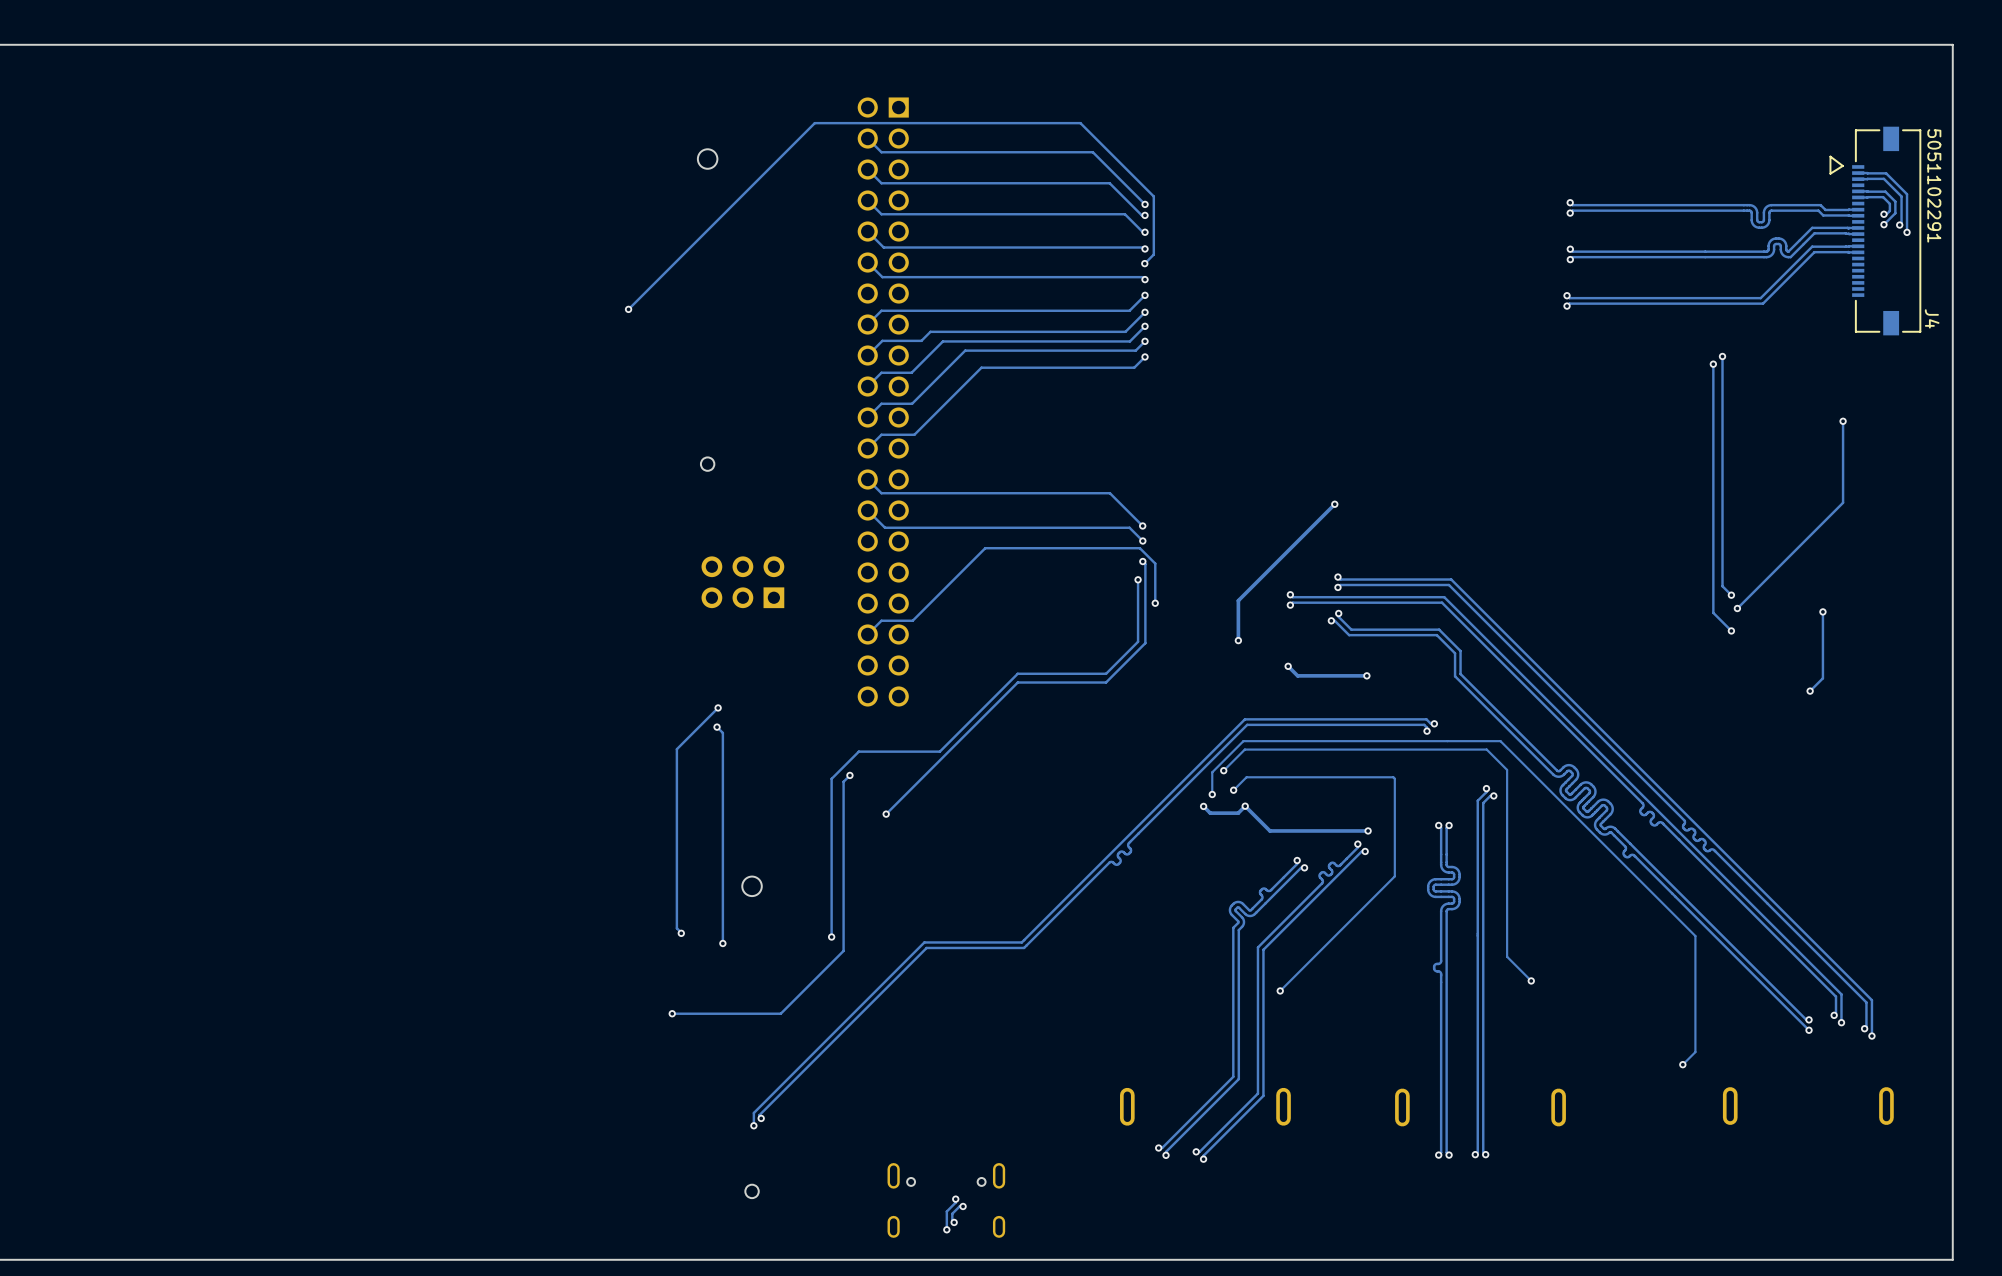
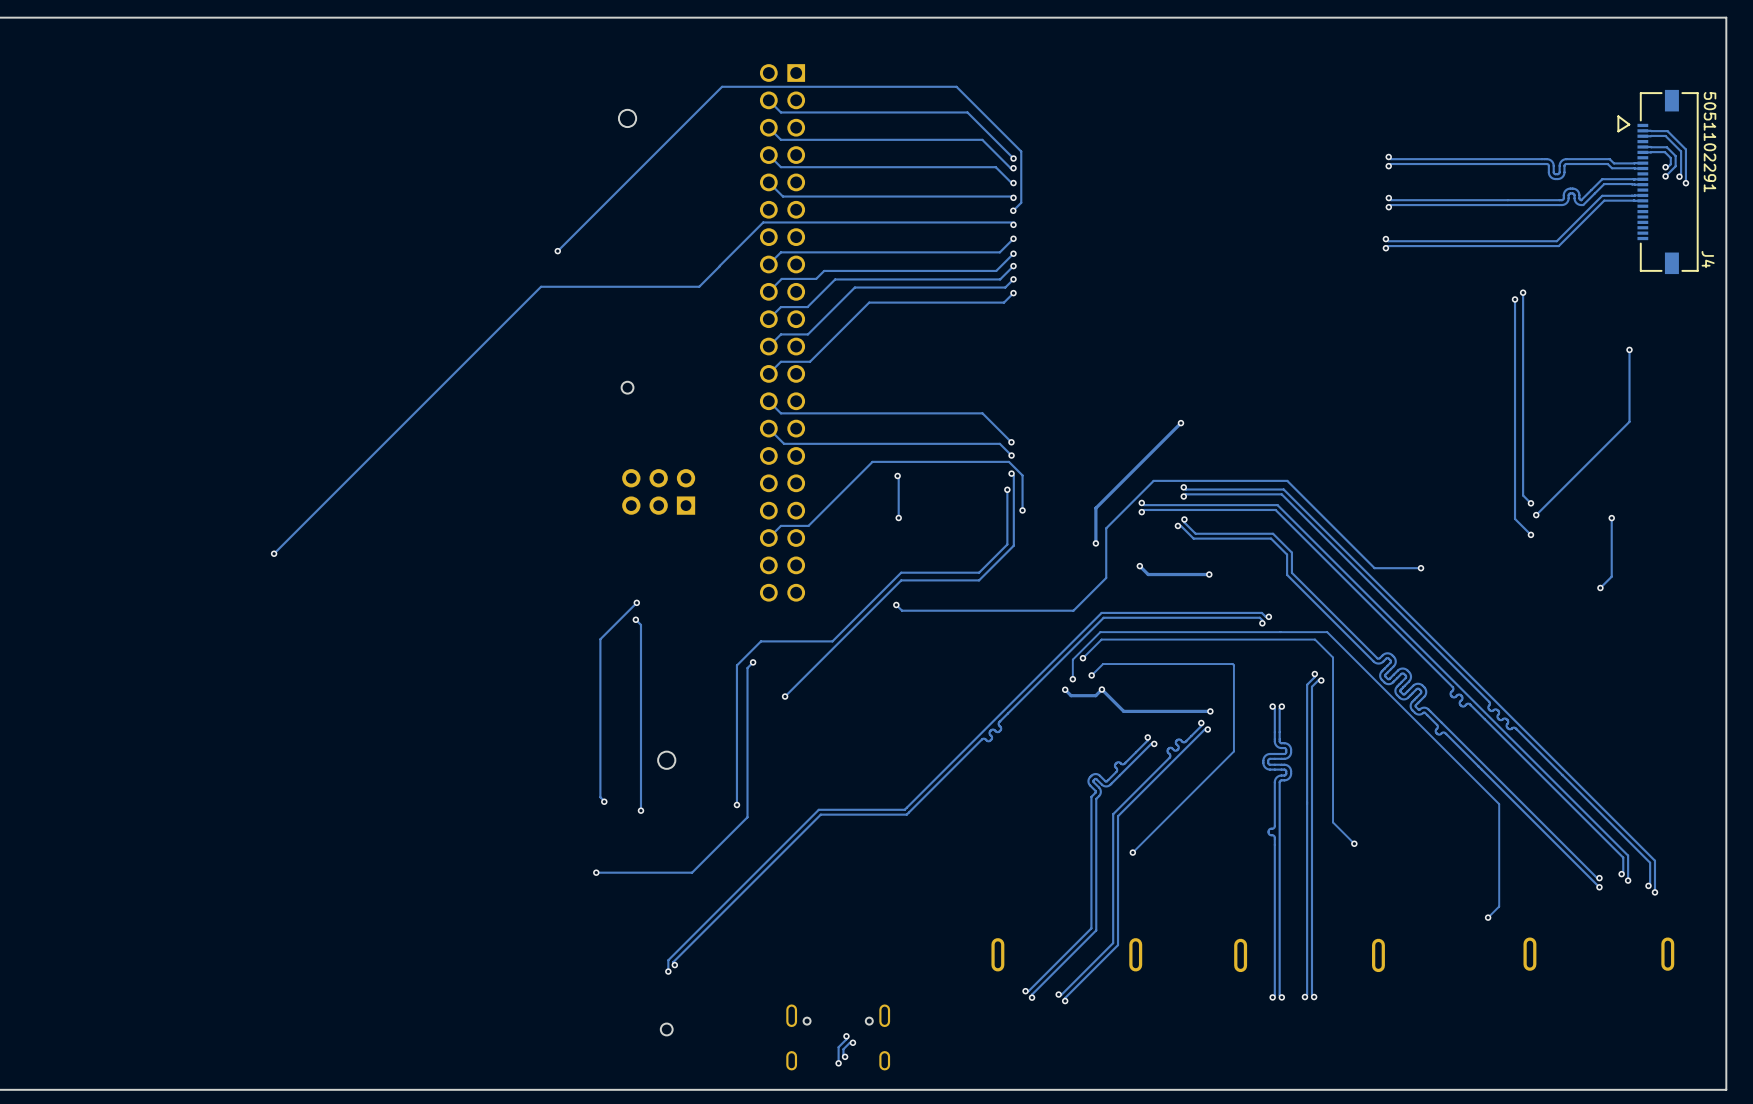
track: (867, 262) (882, 277) (1142, 277) (1145, 279) -> none
track: none -> (1014, 222) (763, 222) (699, 286) (541, 286) (274, 553)
track: none -> (897, 475) (898, 517)
via: none -> (897, 475)
via: none -> (898, 517)
via: none -> (274, 553)
track: none -> (1421, 568) (1374, 568) (1287, 480) (1153, 480) (1106, 528) (1106, 577) (1073, 610) (902, 610) (896, 605)
via: none -> (1421, 568)
via: none -> (896, 605)

